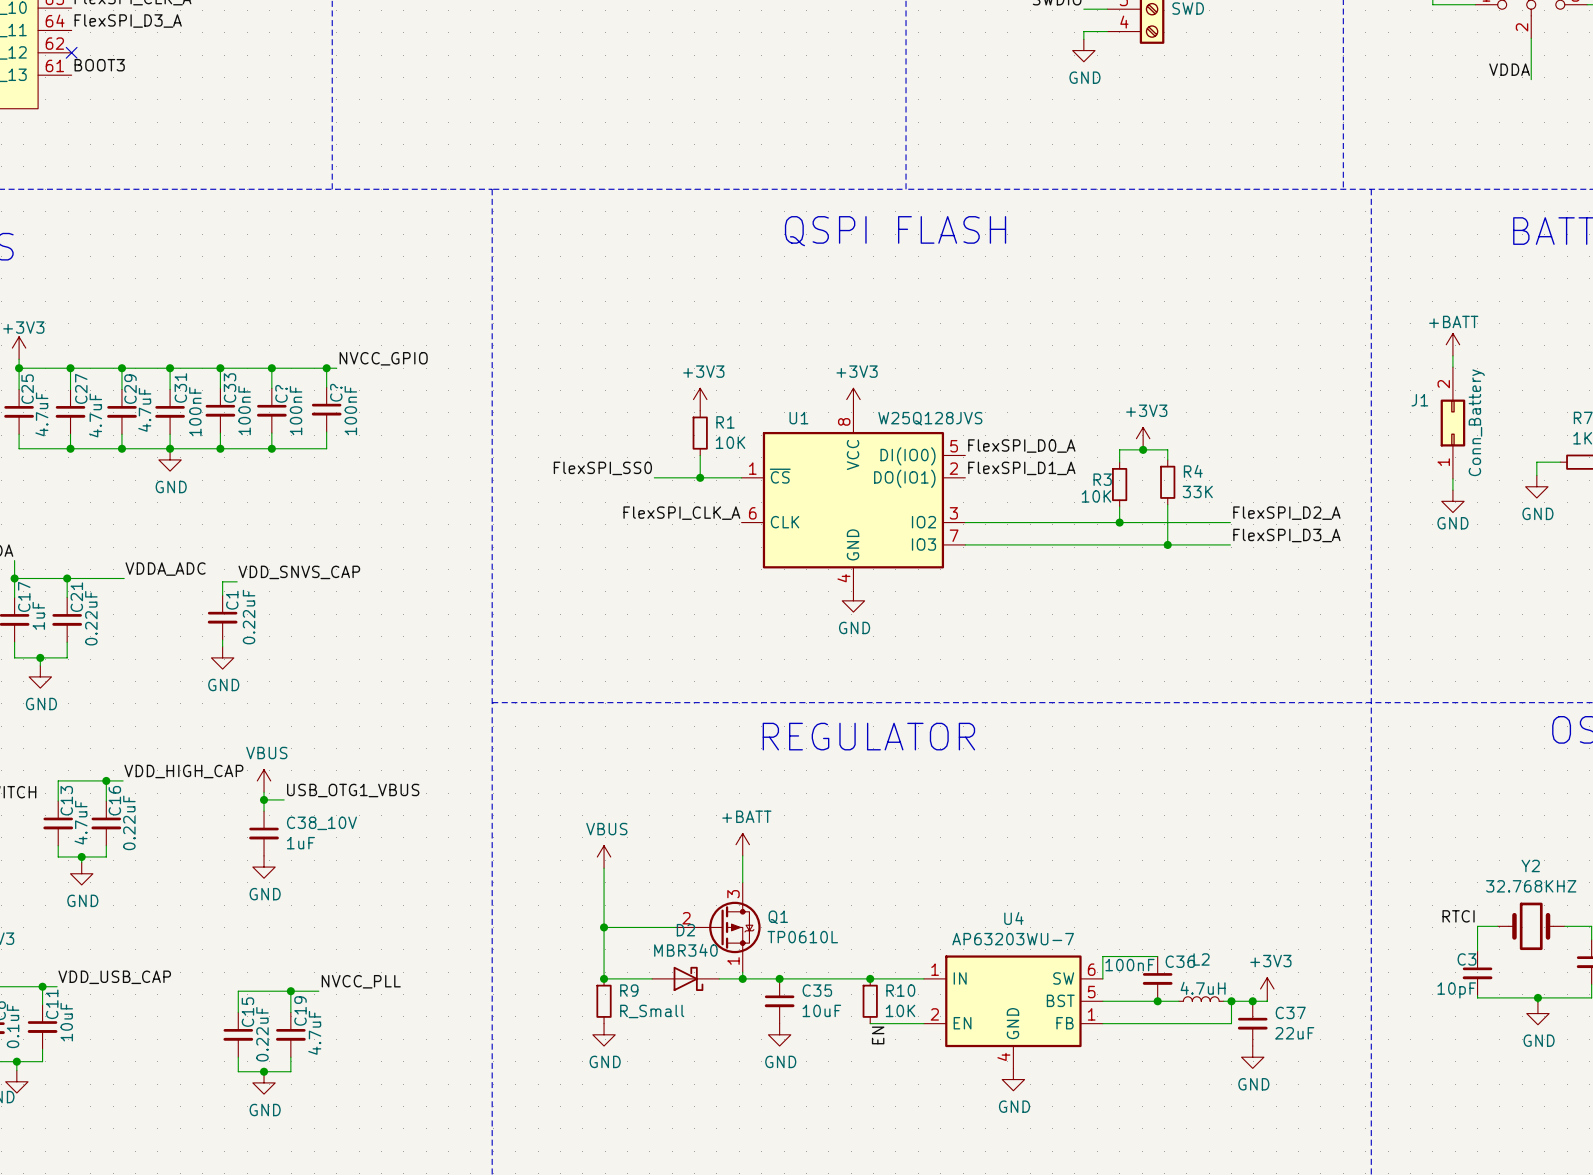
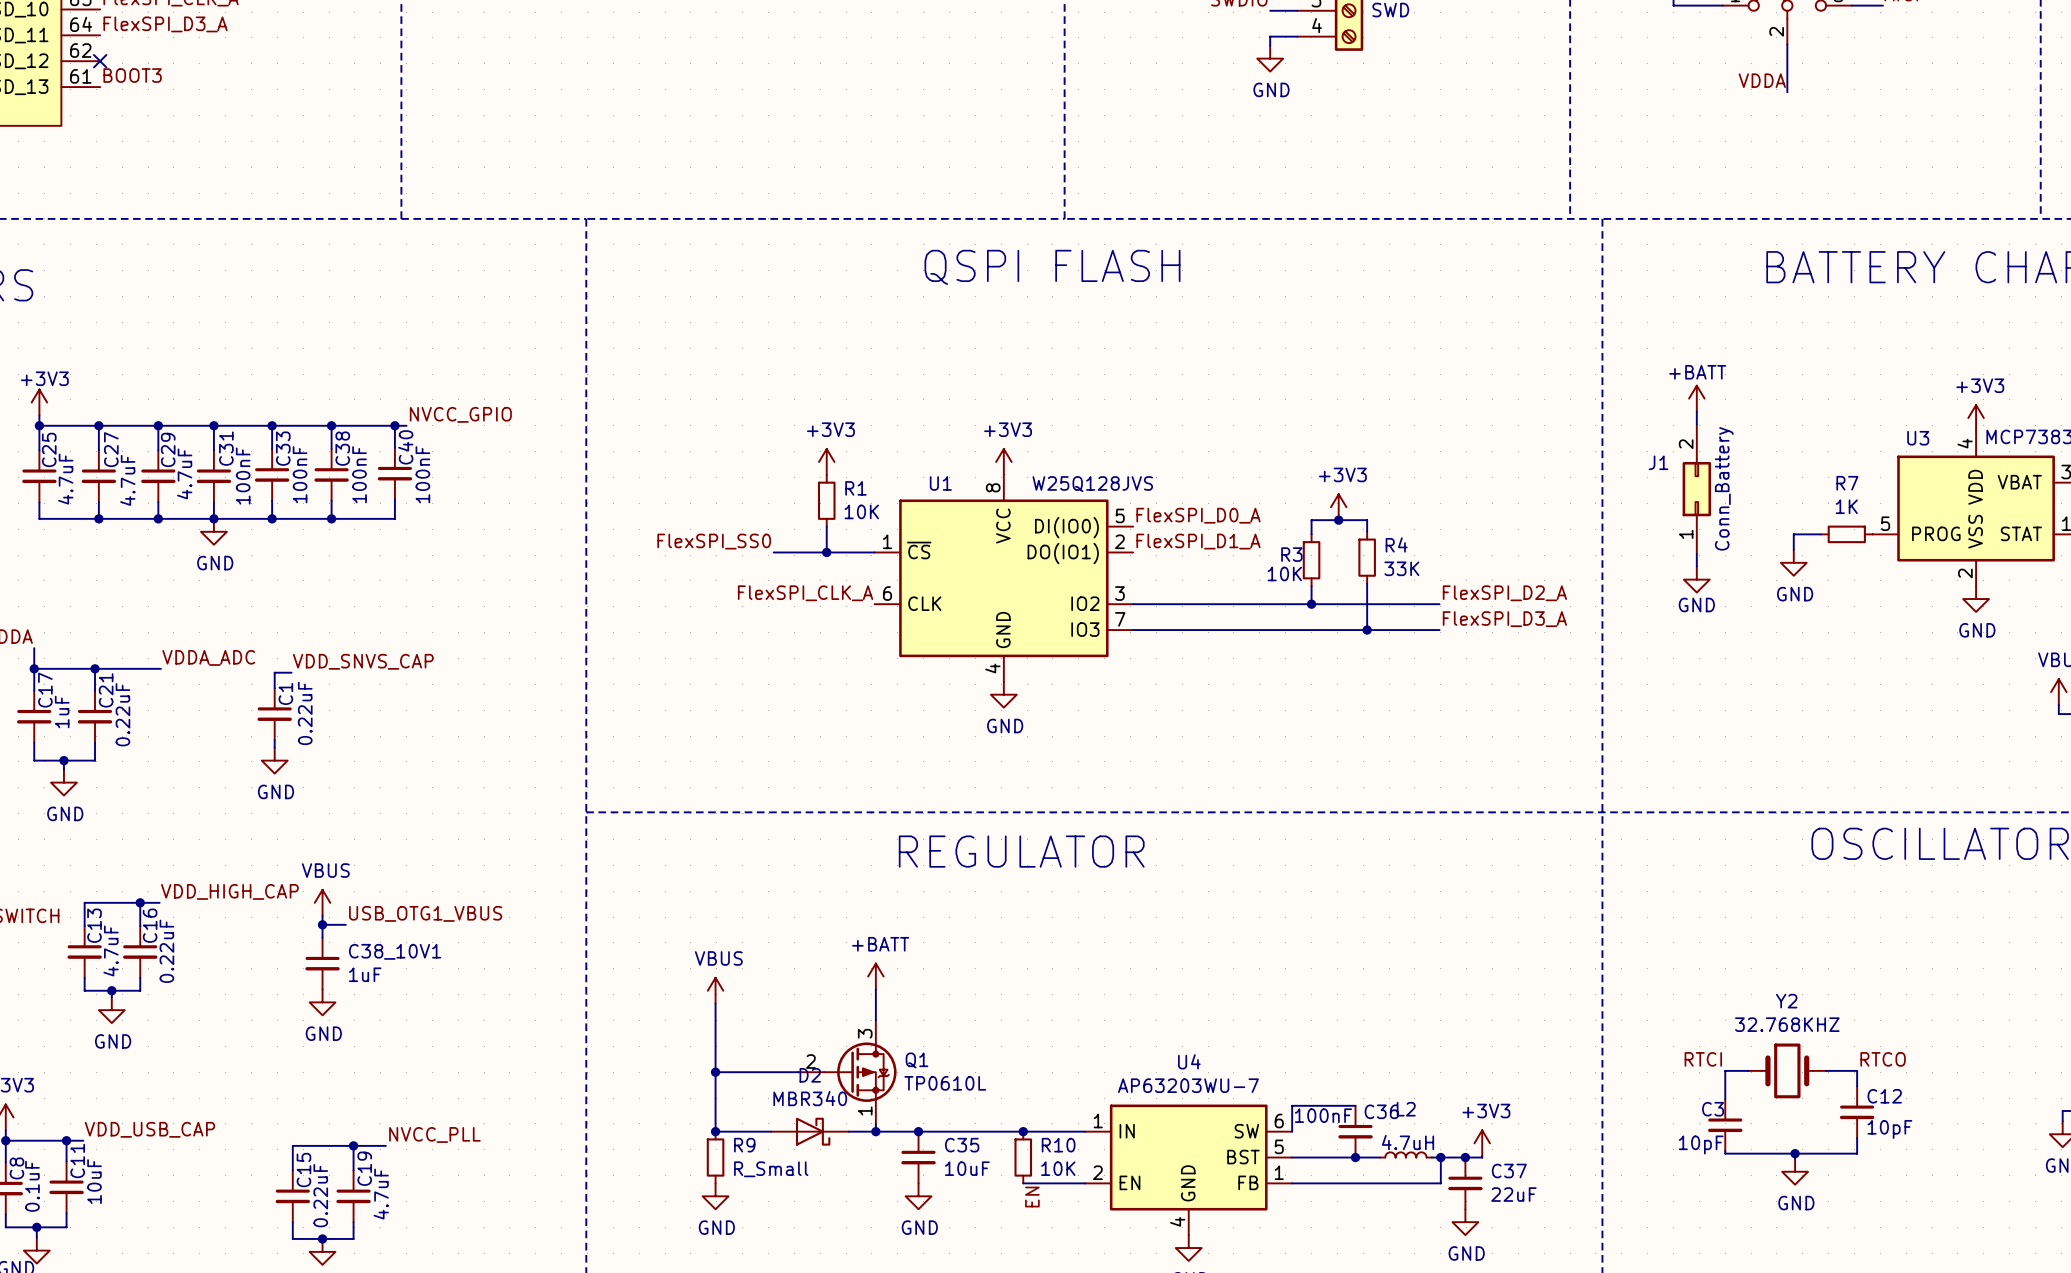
C? name: C? (336, 392) -> C40 (405, 447)
C? name: C? (281, 393) -> C38 (342, 448)
C38_10V name: C38_10V (321, 823) -> C38_10V1 (395, 951)

